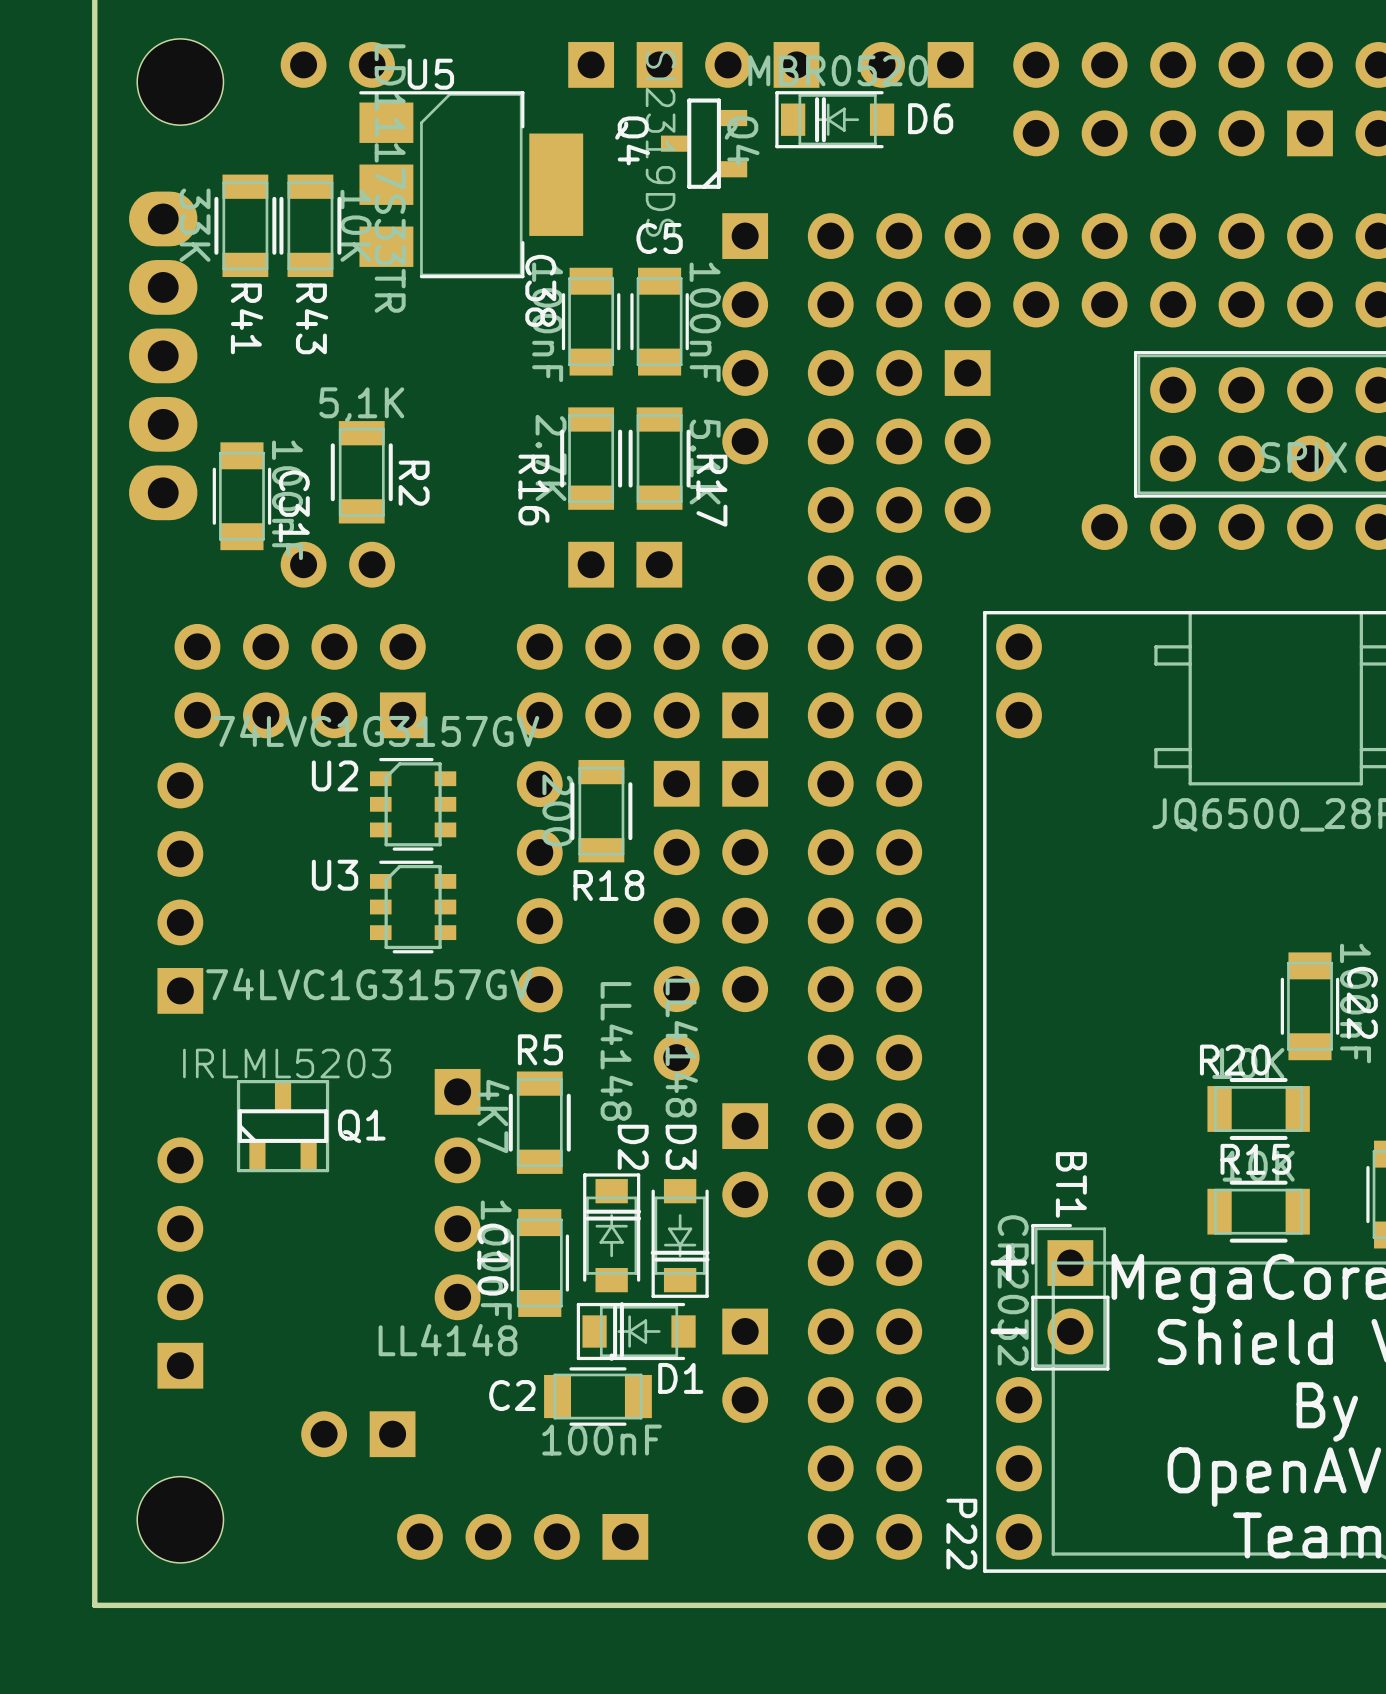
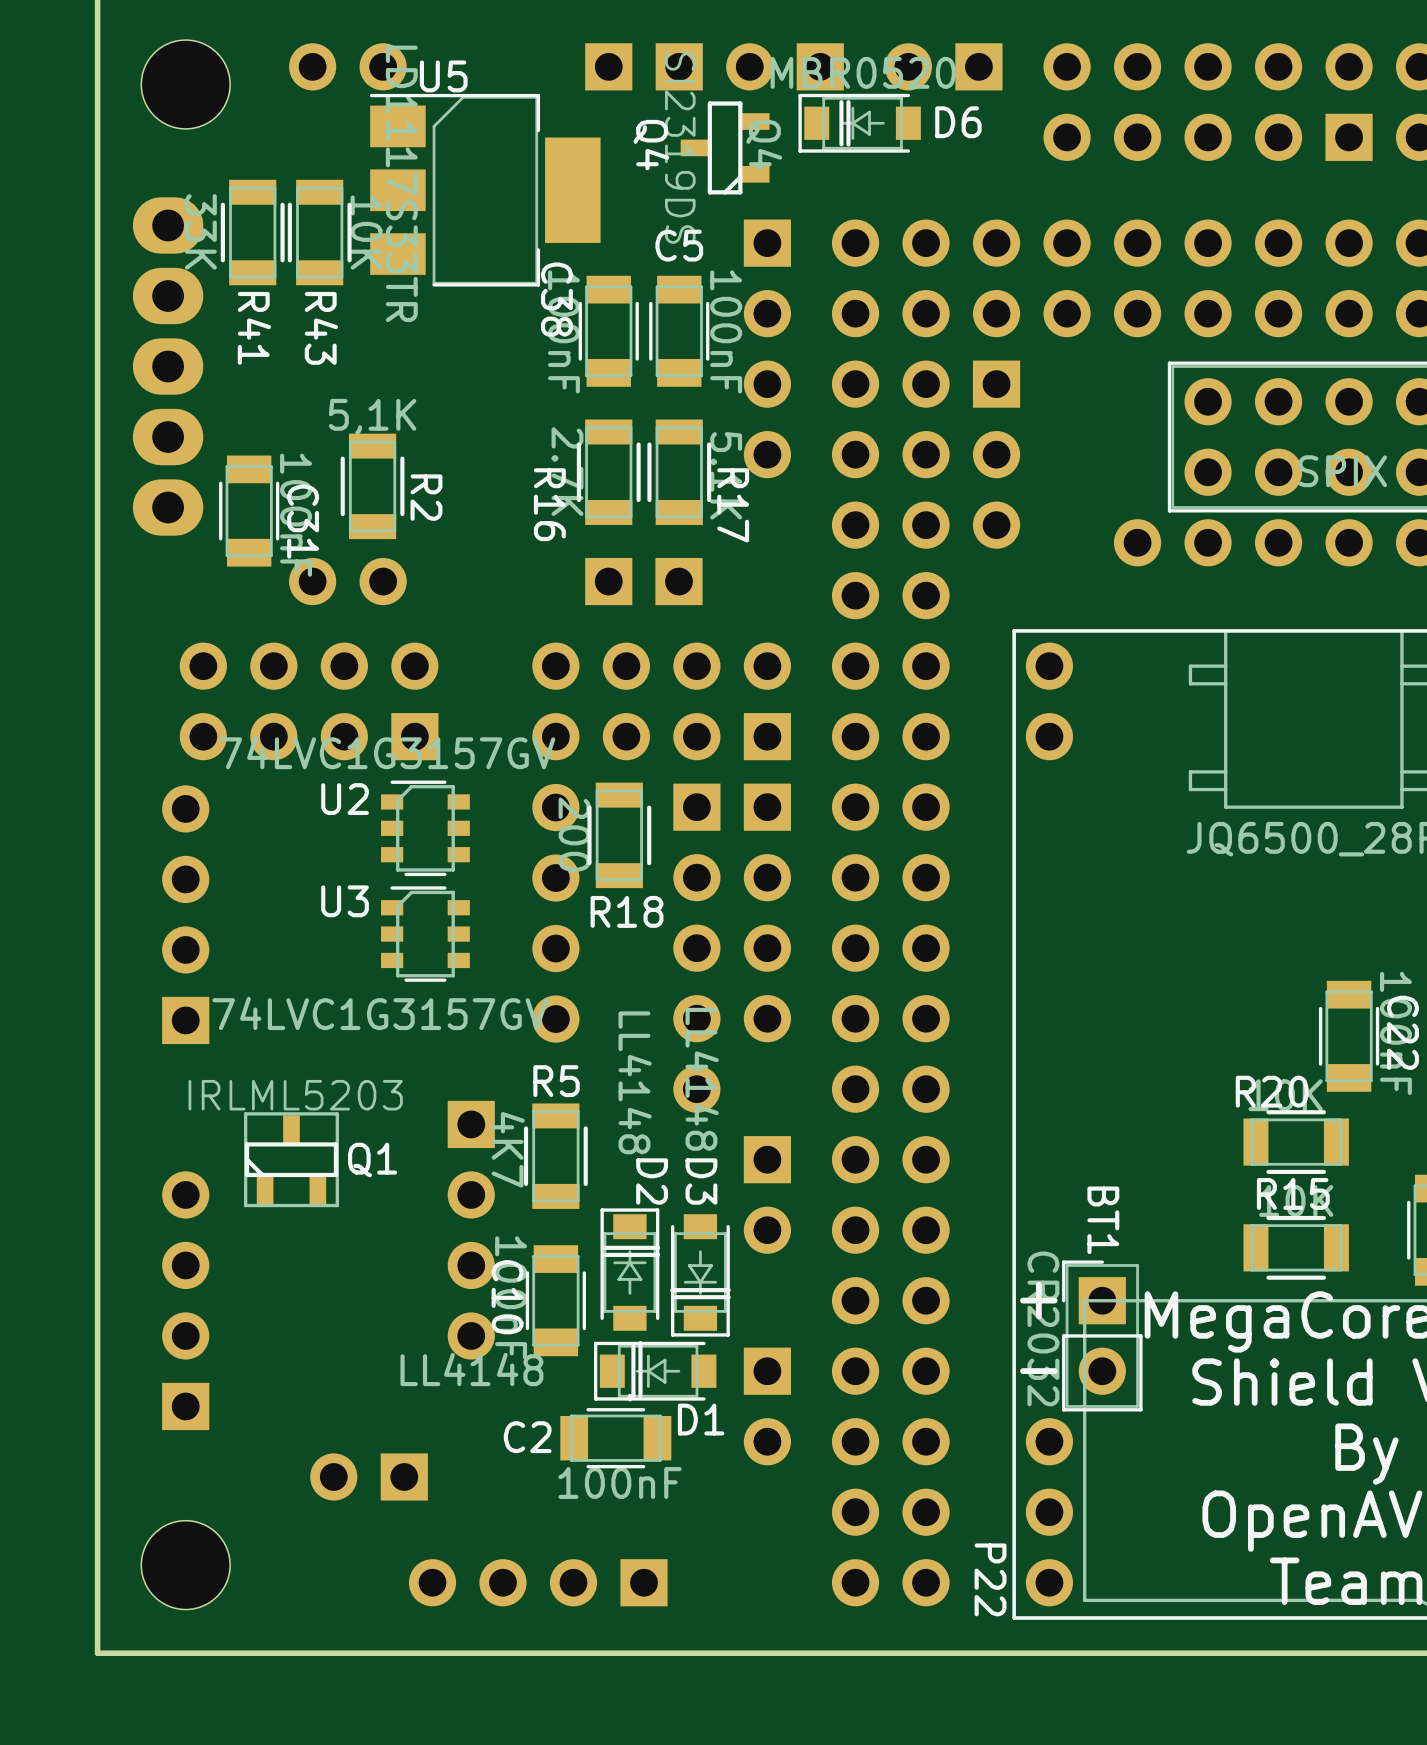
D1 value position: LL4148 (447, 1340) -> LL4148 (471, 1369)

